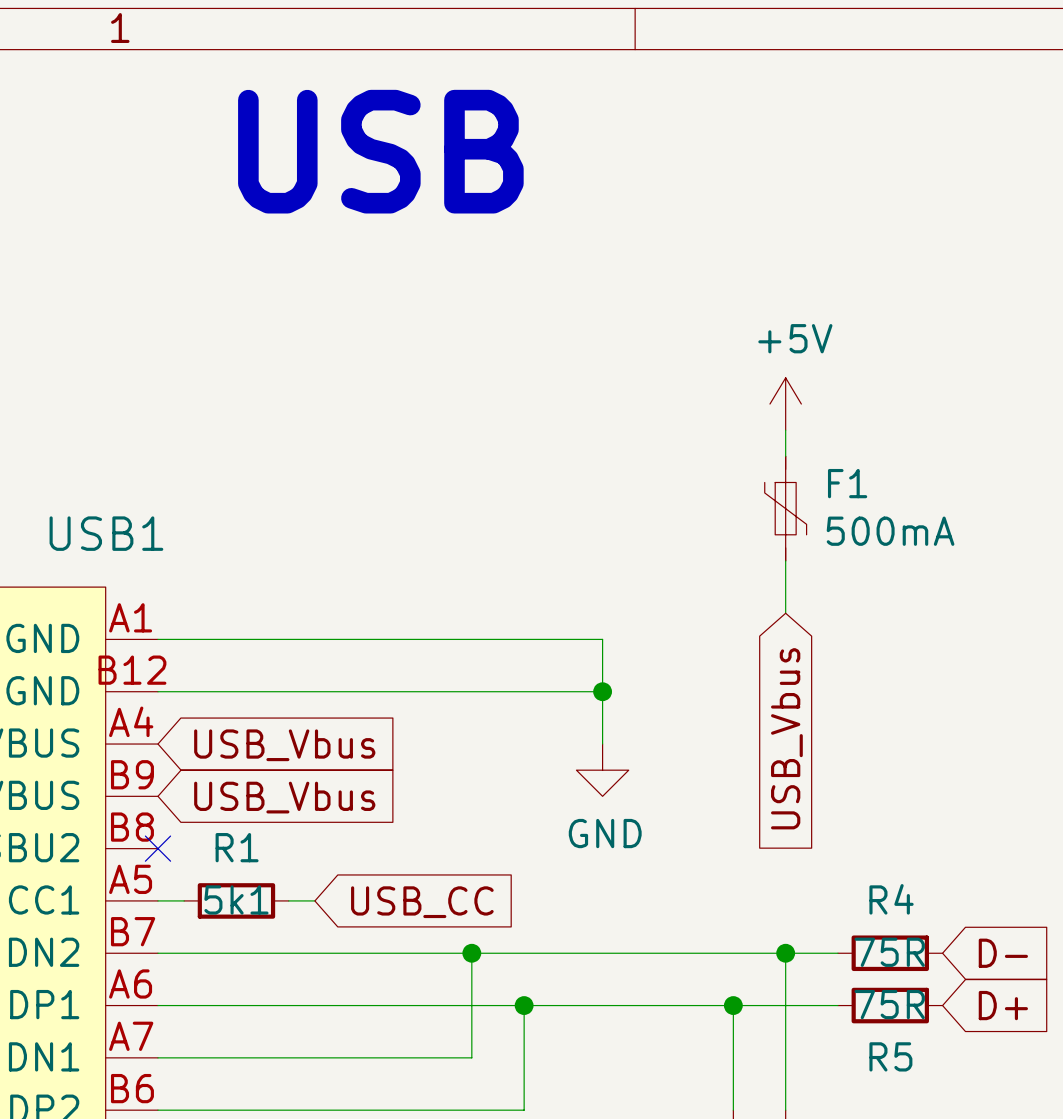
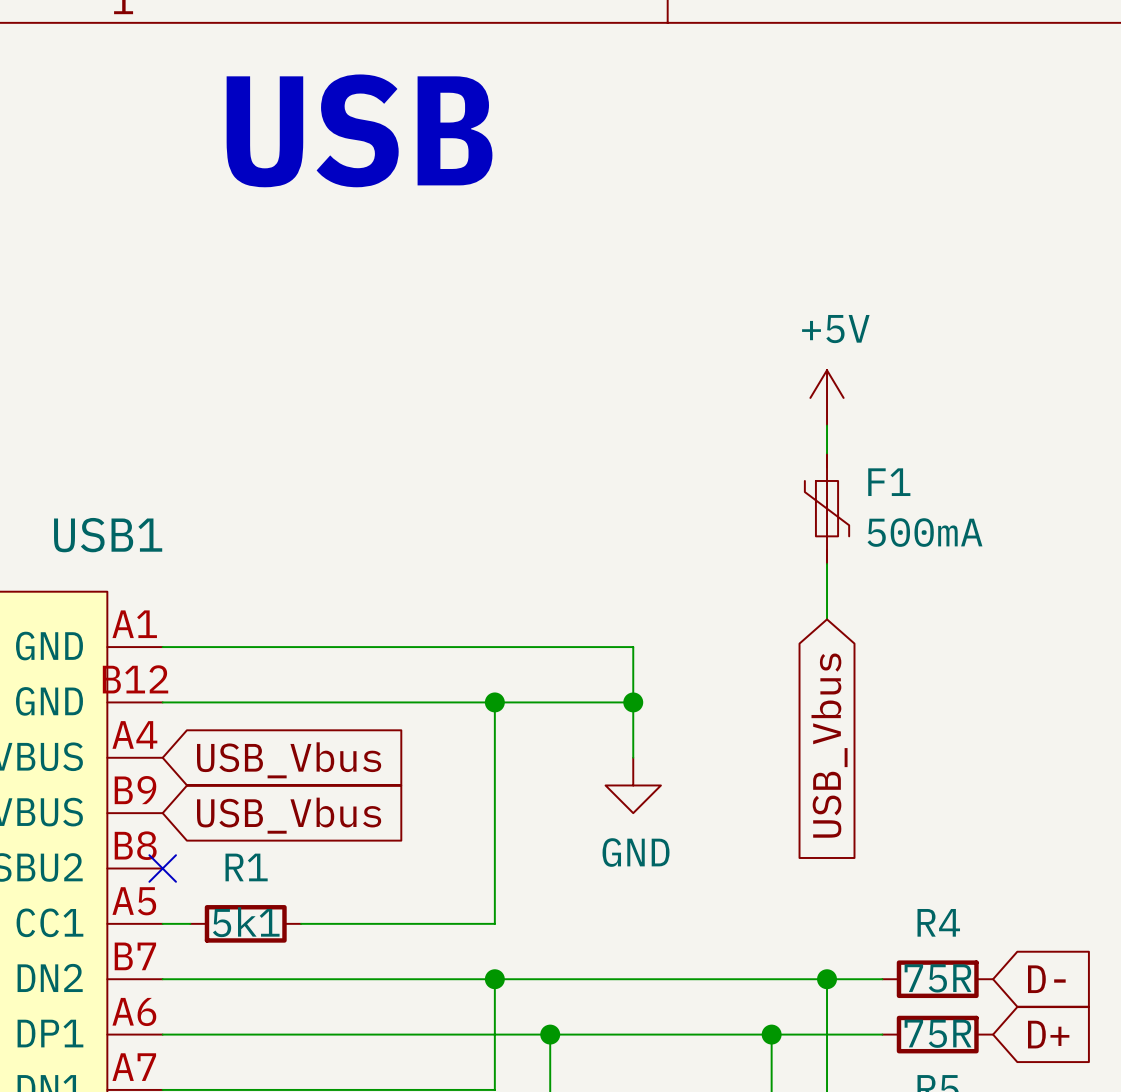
wire: none -> (494, 702) (494, 923) (328, 923)
junction: none -> (494, 702)
global label: USB_CC (422, 902) -> none

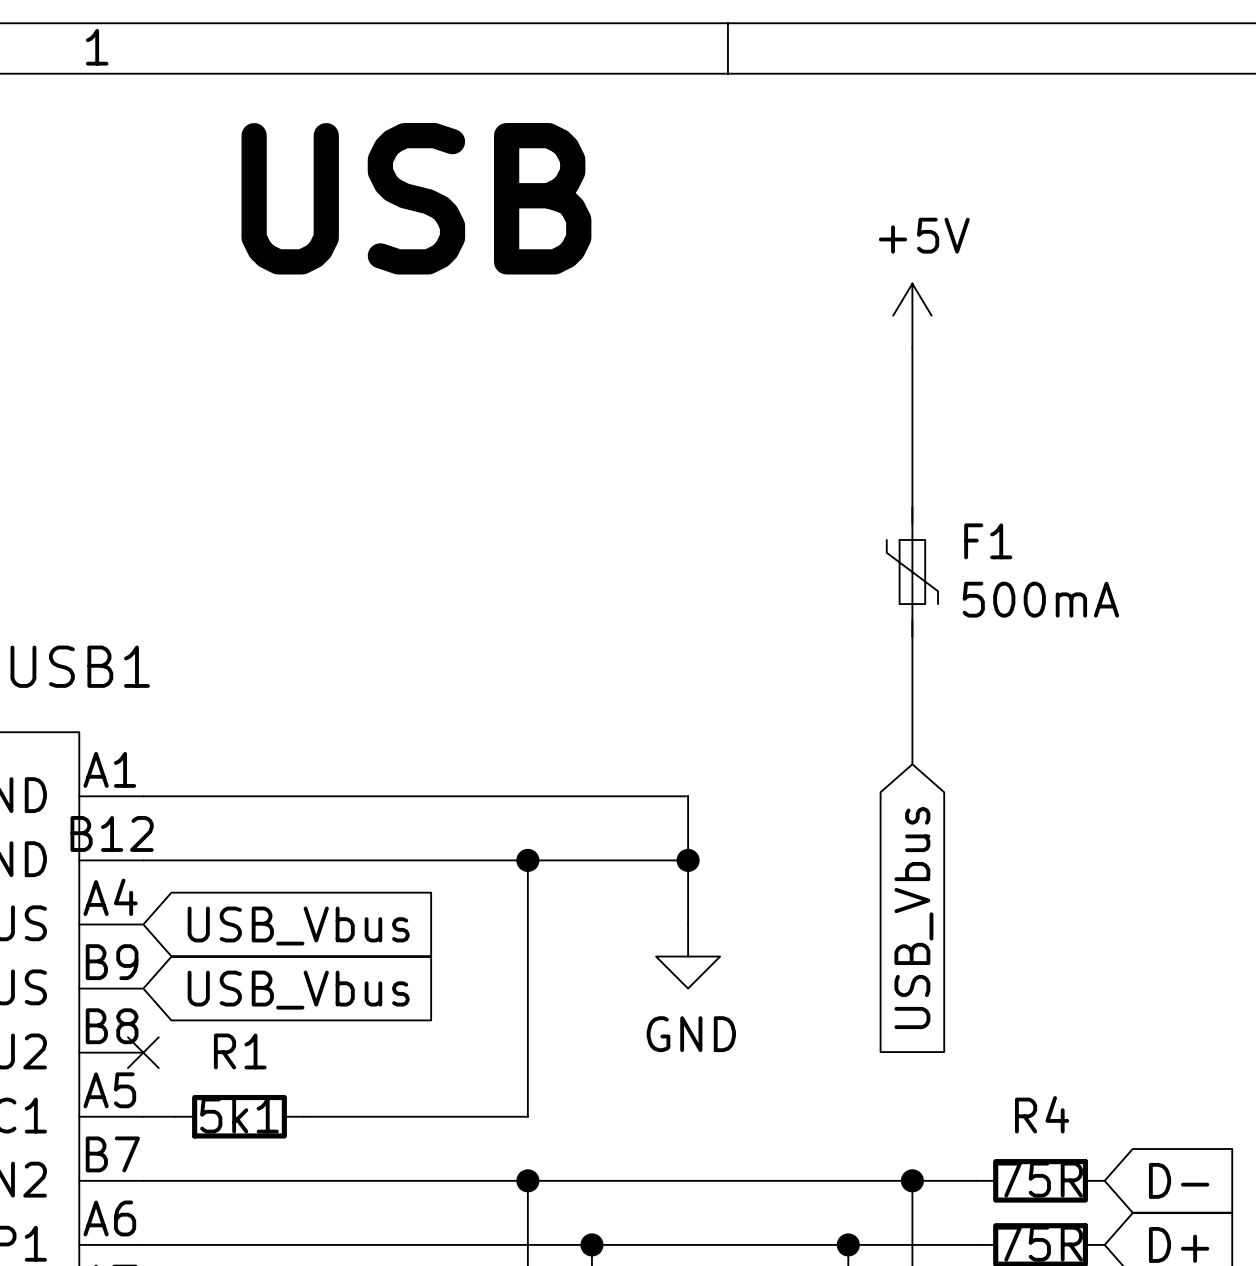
wire: none -> (912, 347) (912, 507)
power symbol position: +5V (827, 397) -> +5V (912, 315)
F1 position: (827, 508) -> (912, 572)

